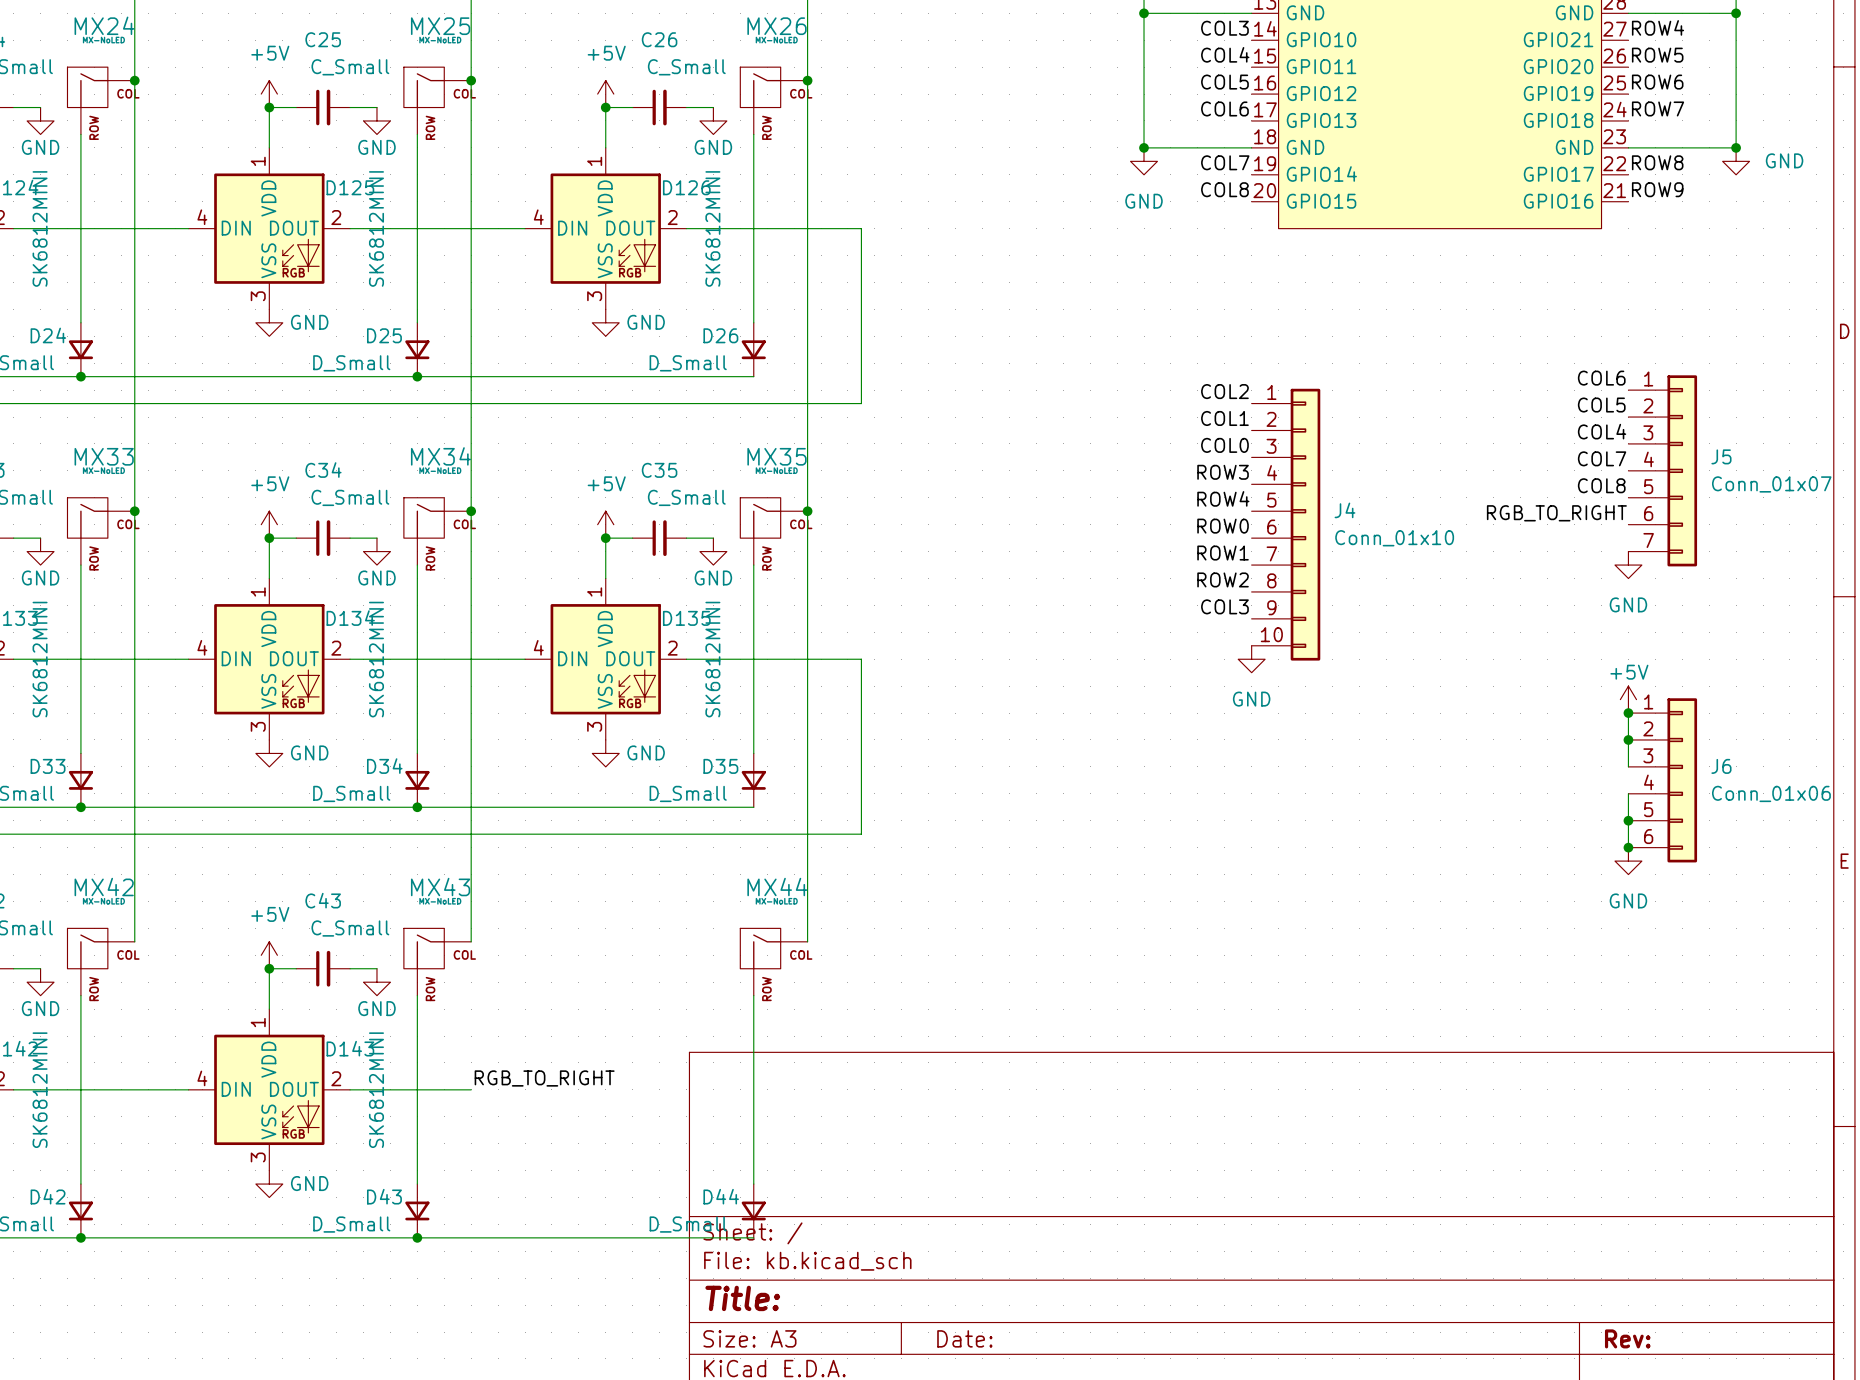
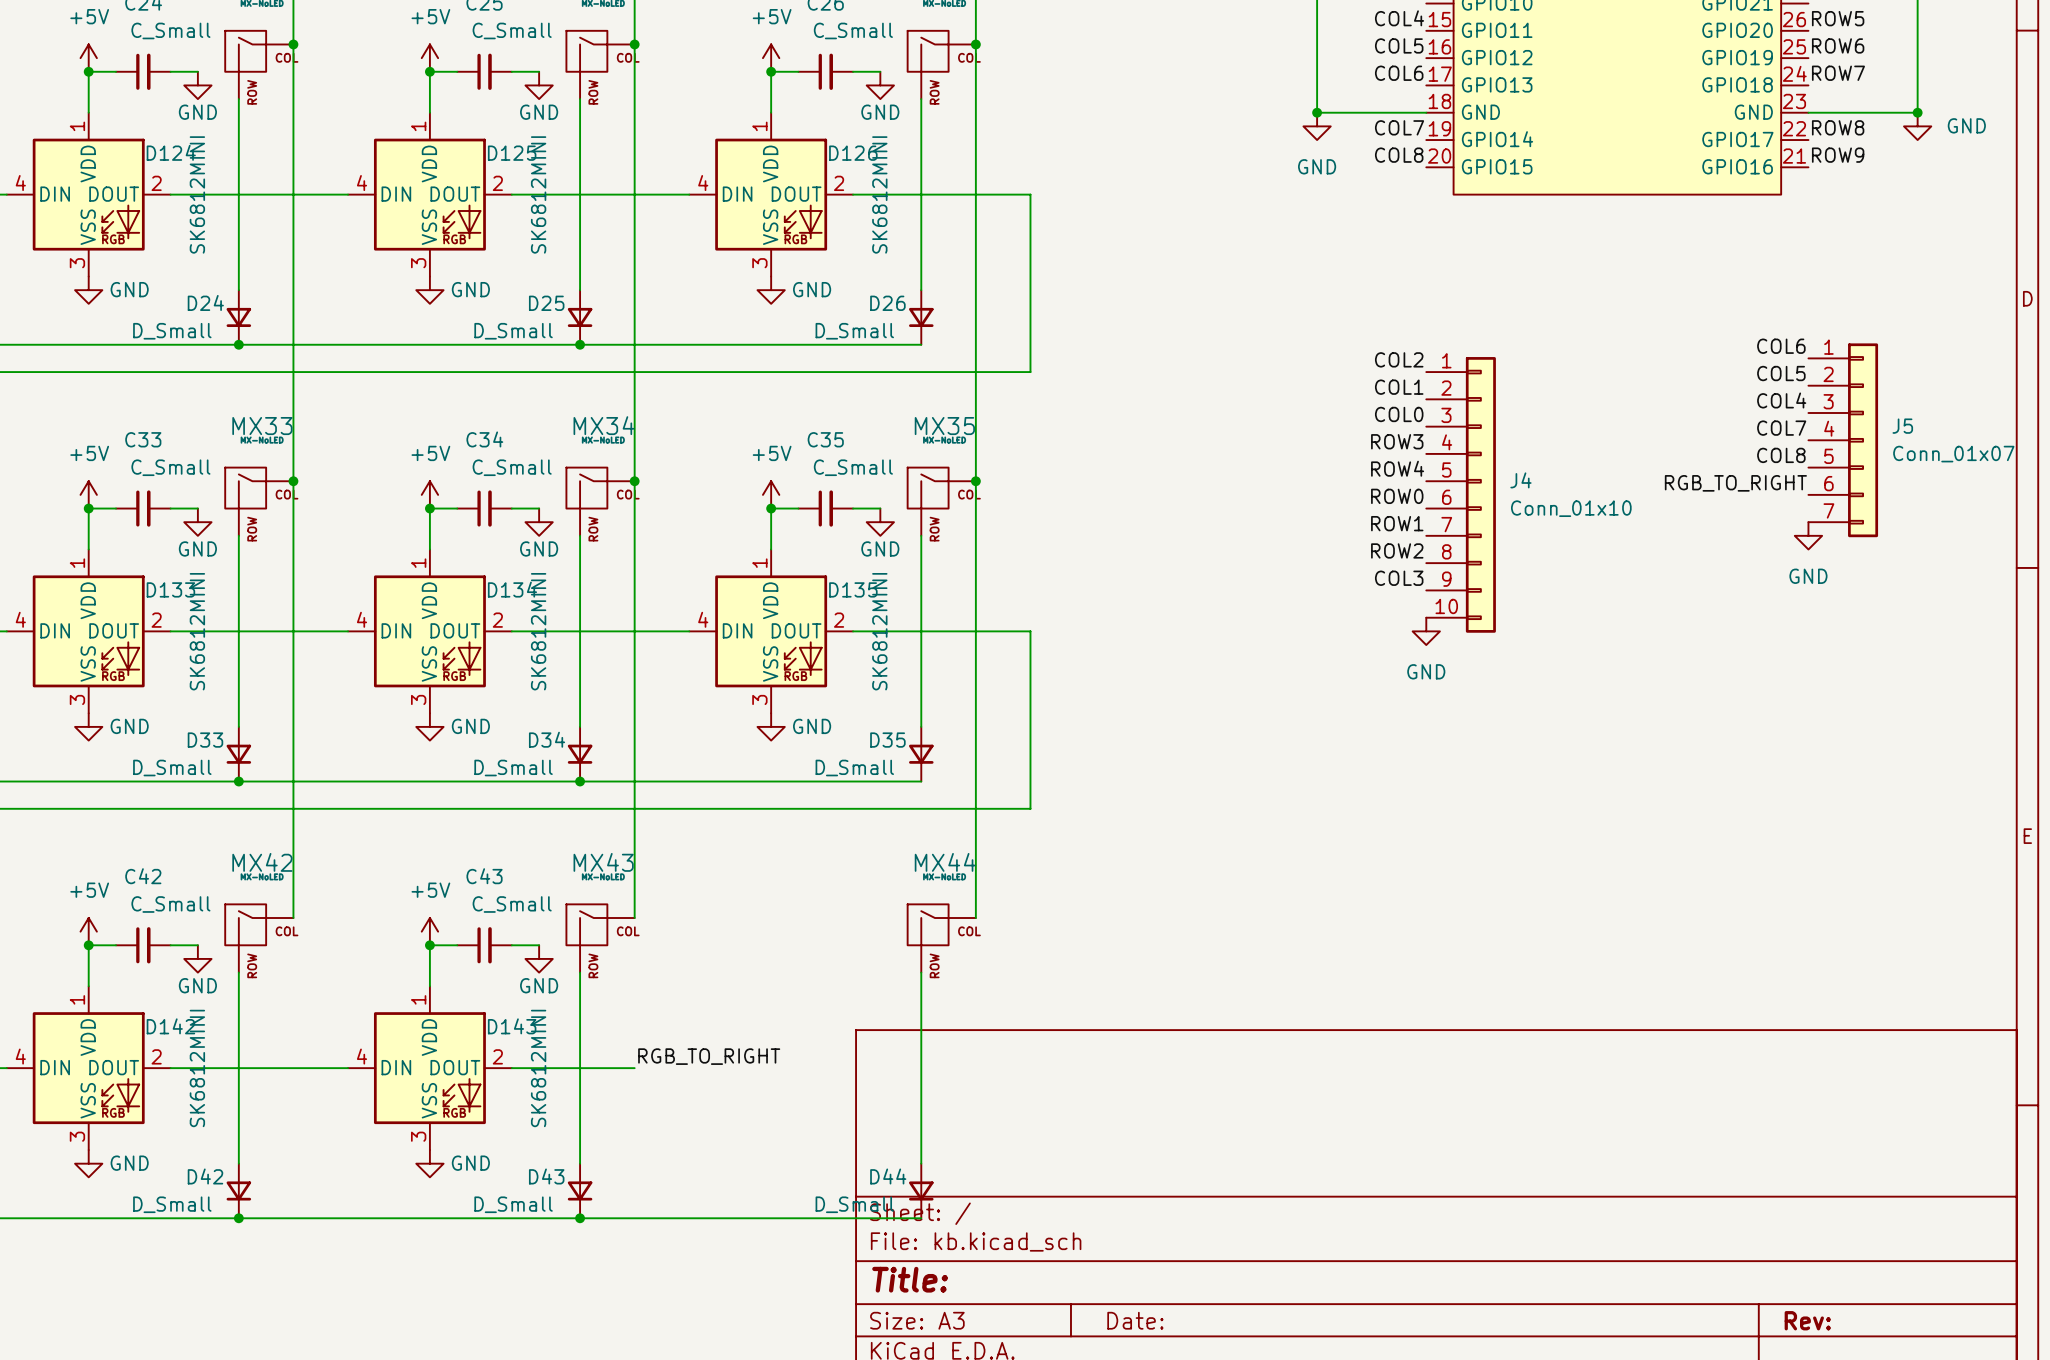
power symbol: +5V (1628, 699) -> none
wire: (1628, 713) (1628, 766) -> none
junction: (1628, 713) -> none
junction: (1628, 739) -> none
J6: Conn_01x06 (1662, 780) -> none
wire: (1628, 793) (1628, 847) -> none
junction: (1628, 820) -> none
junction: (1628, 847) -> none
power symbol: GND (1628, 861) -> none

